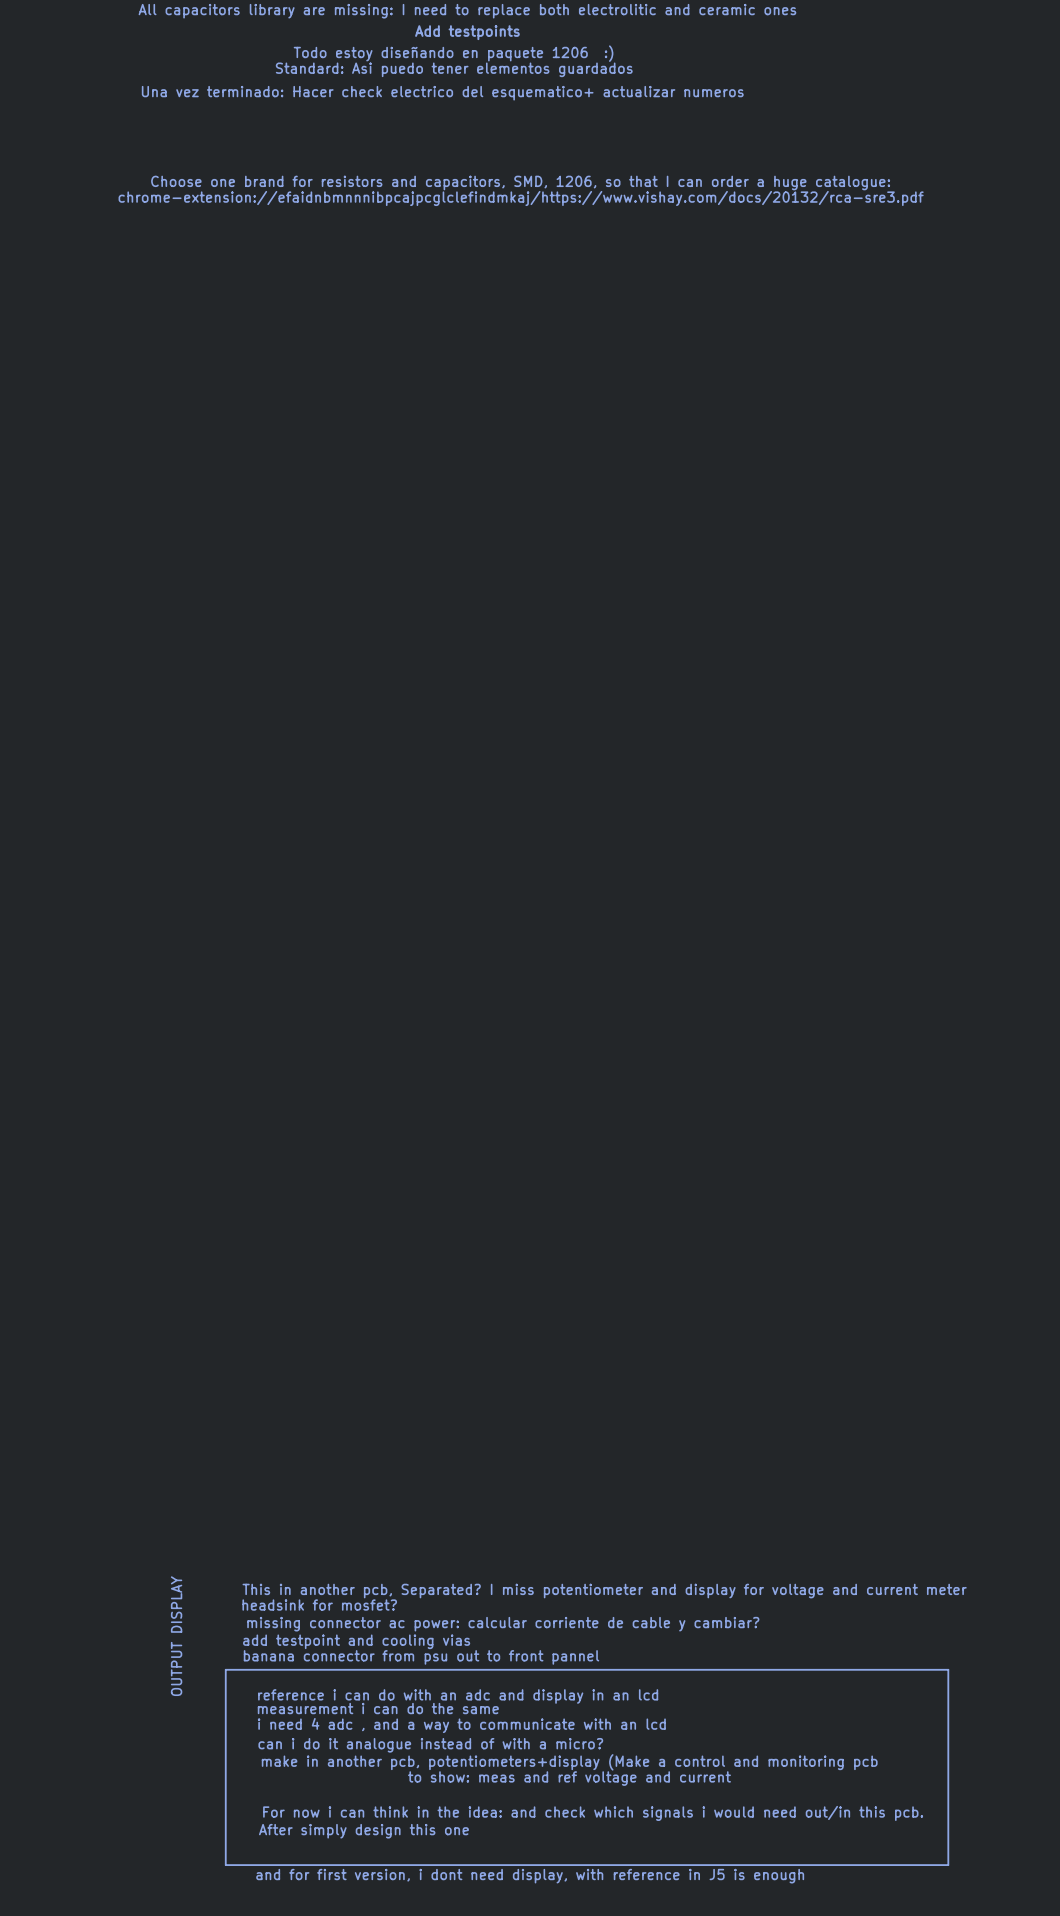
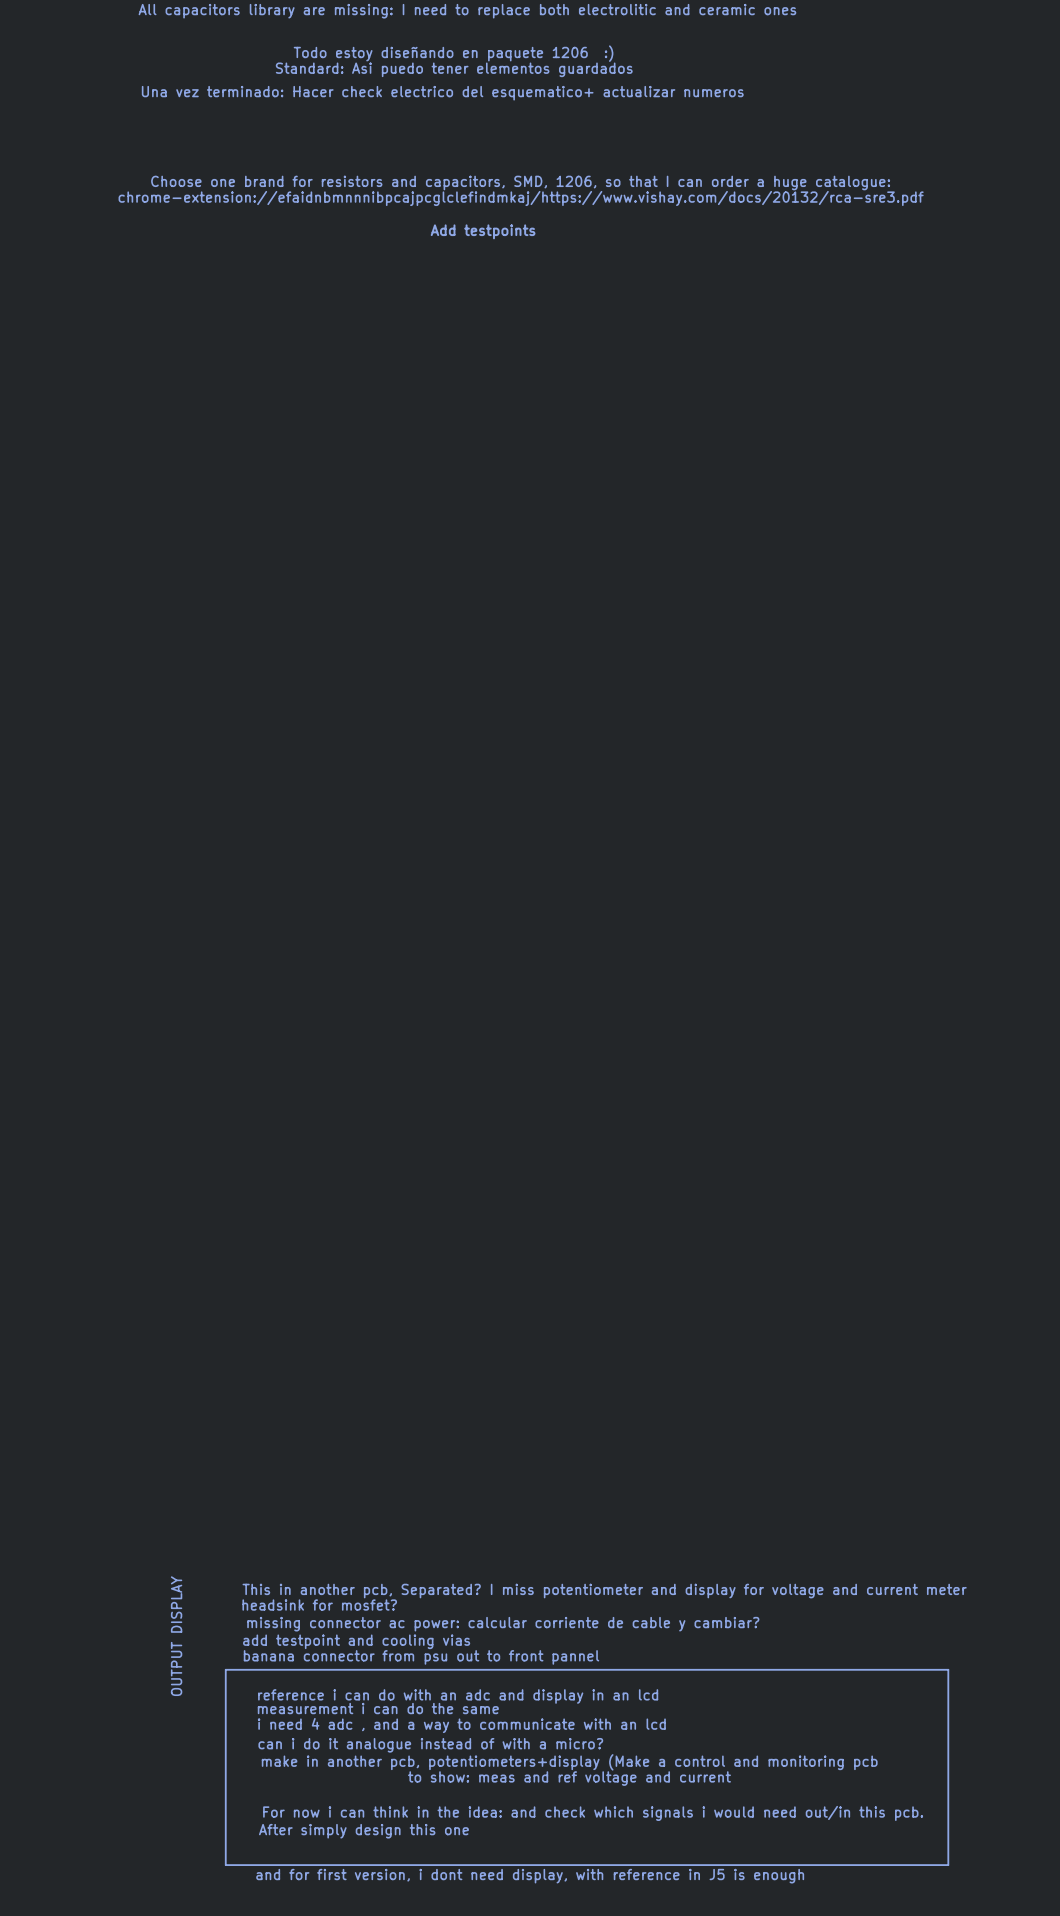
text: Add testpoints (467, 32) -> none
text: none -> Add testpoints (483, 231)

